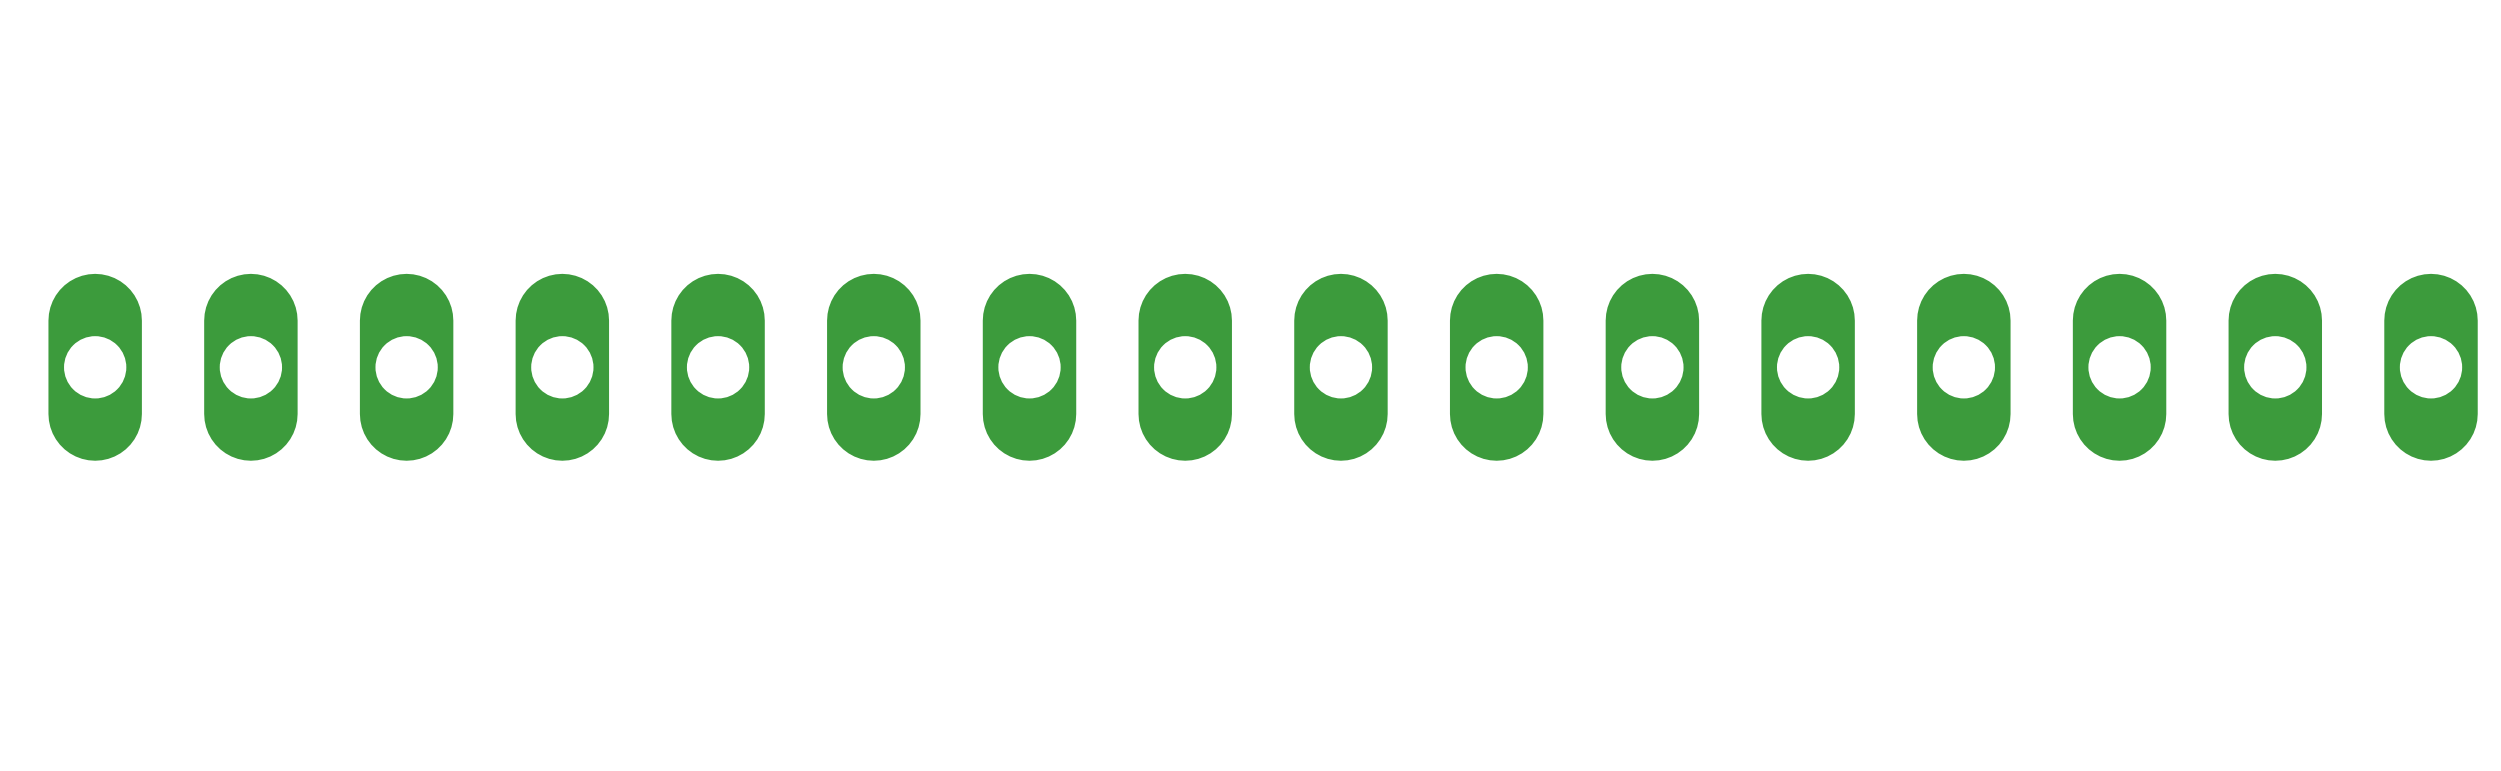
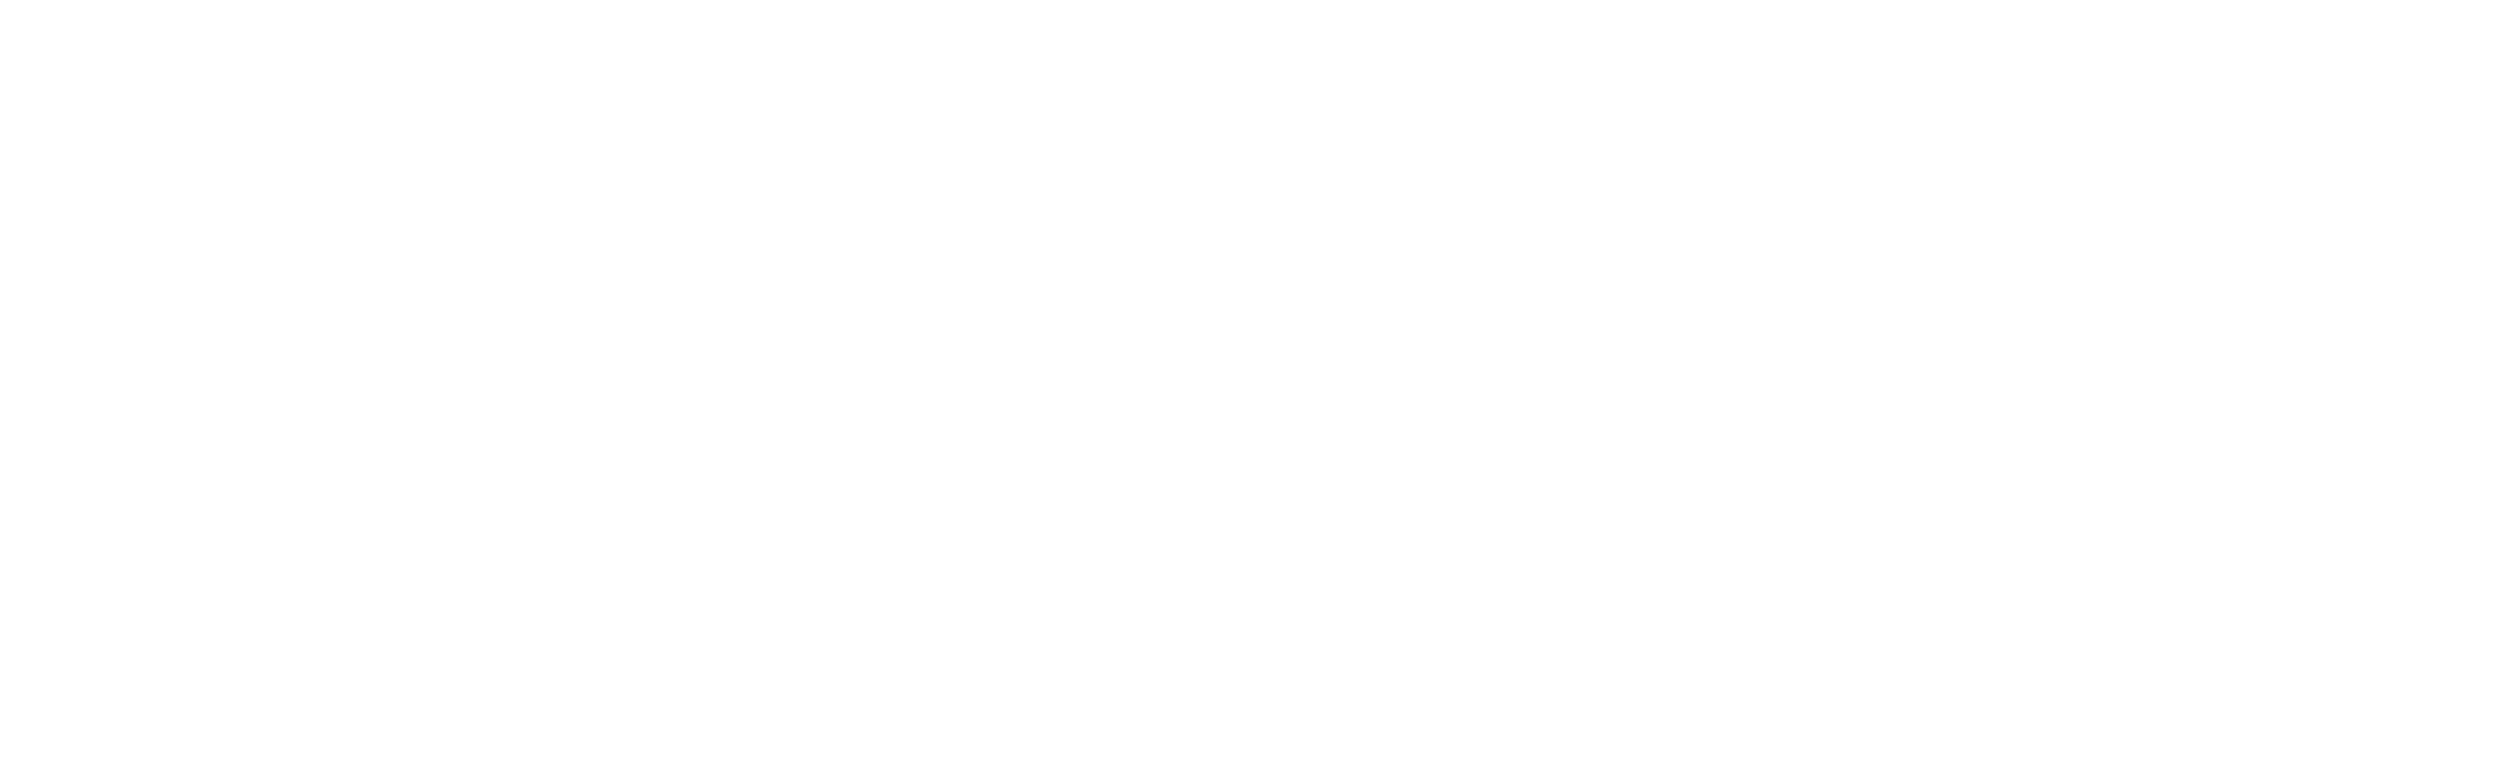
part: (1263, 367) -> none

